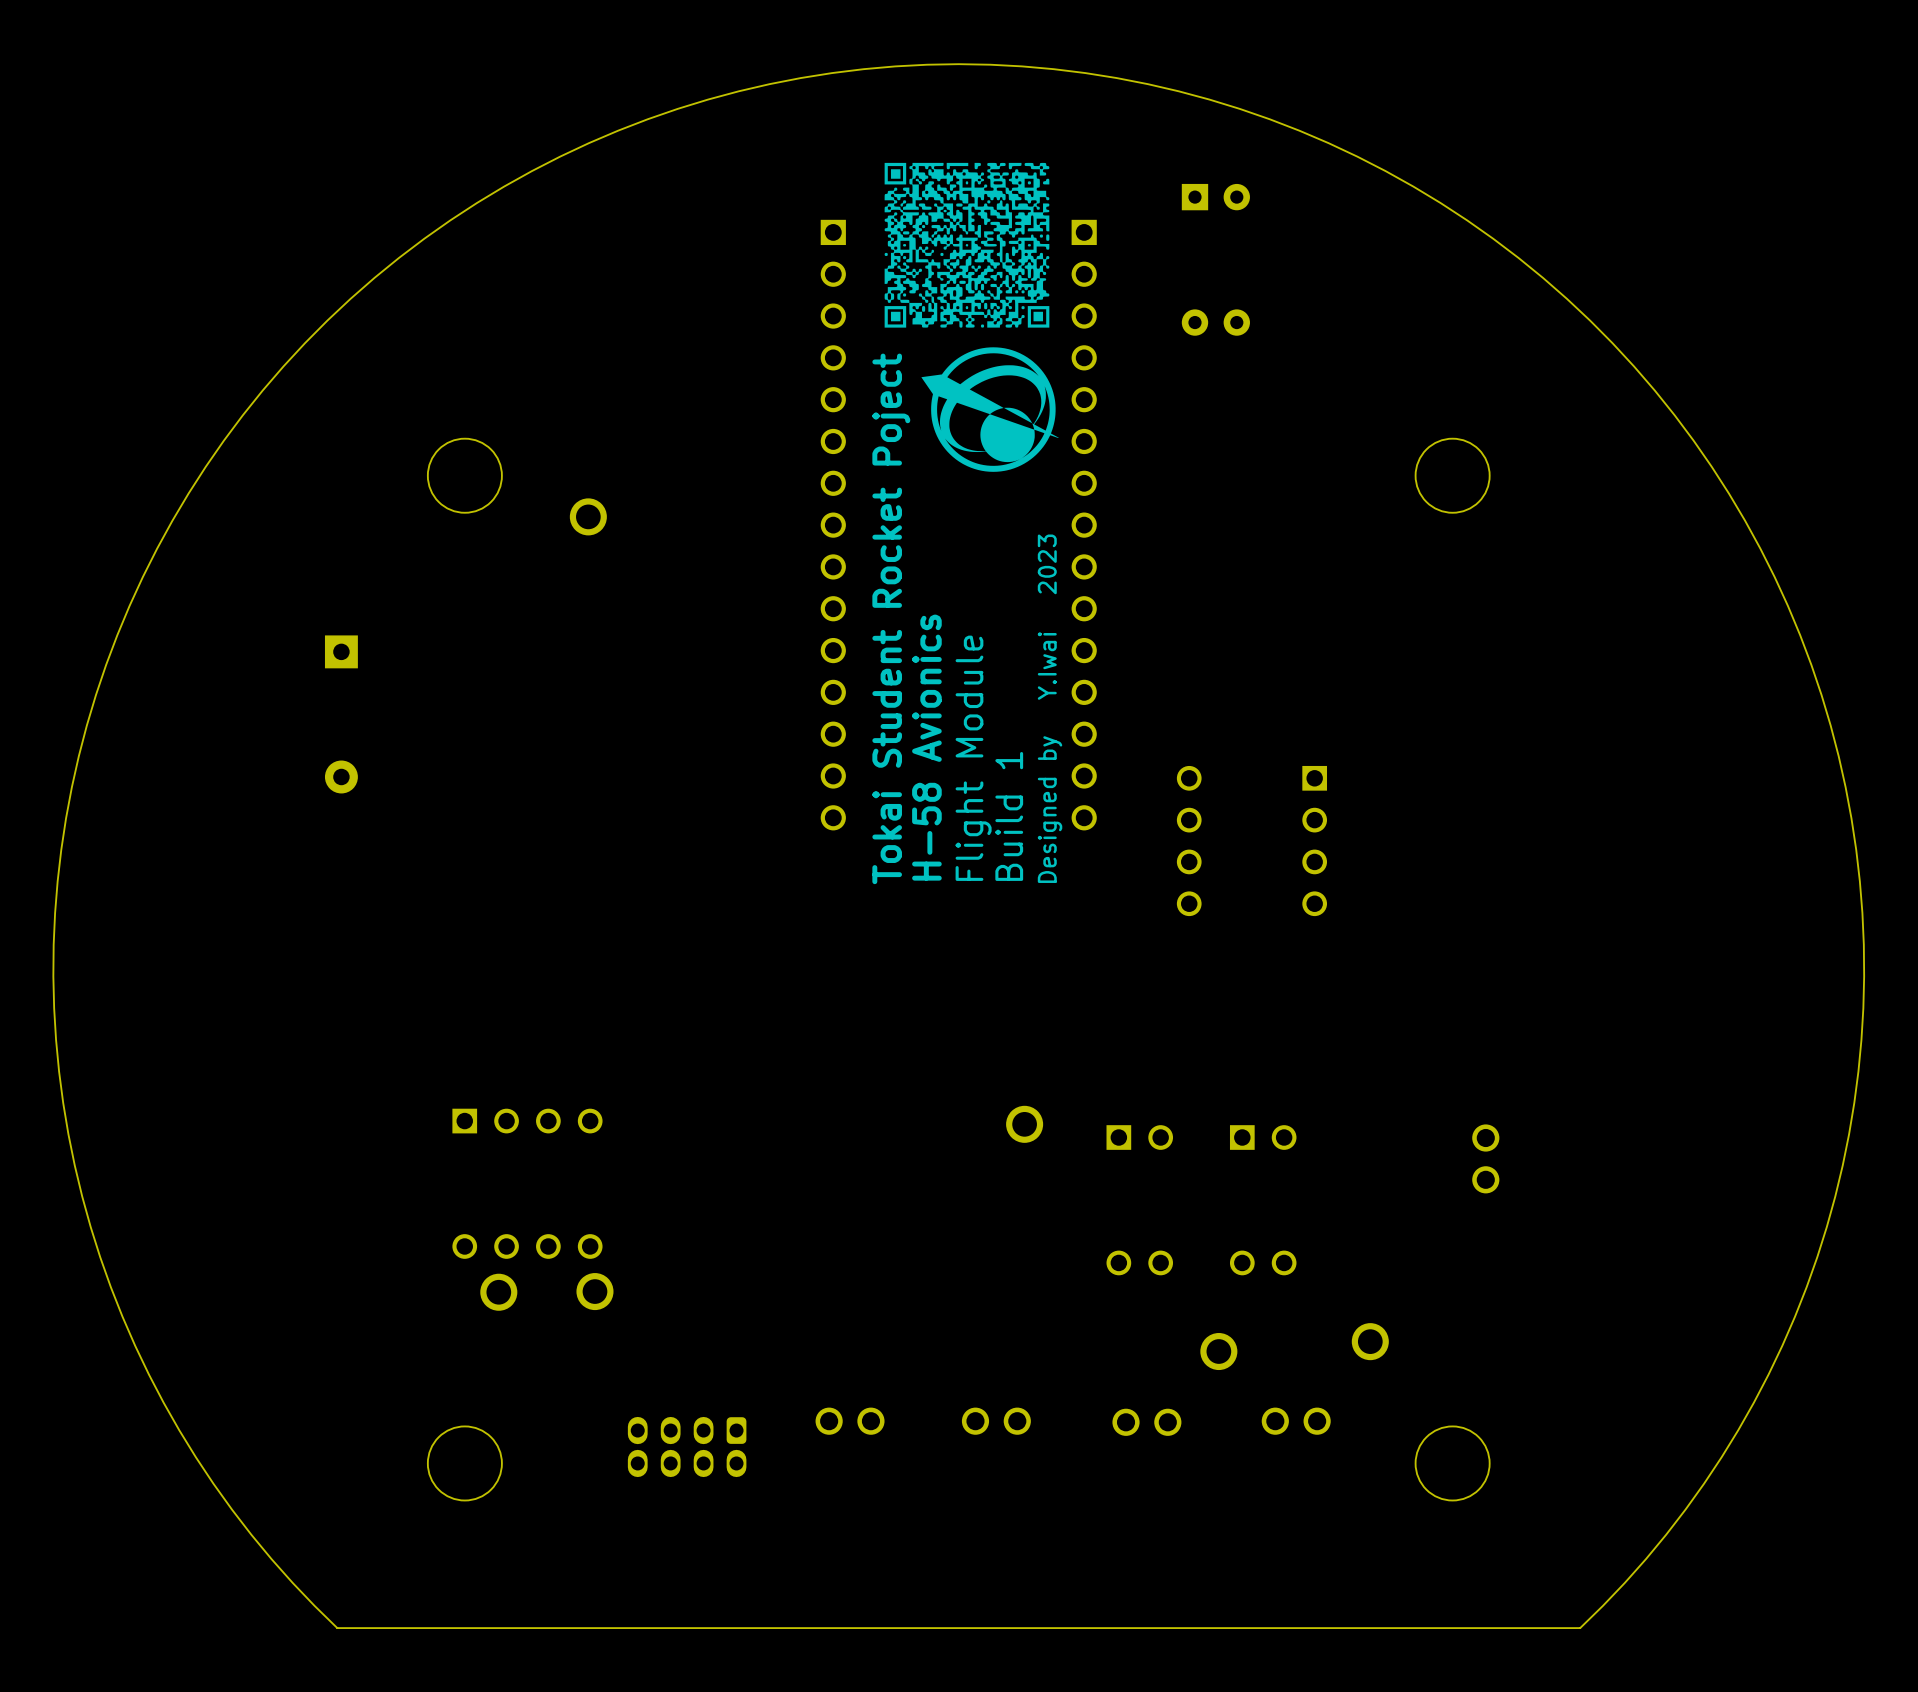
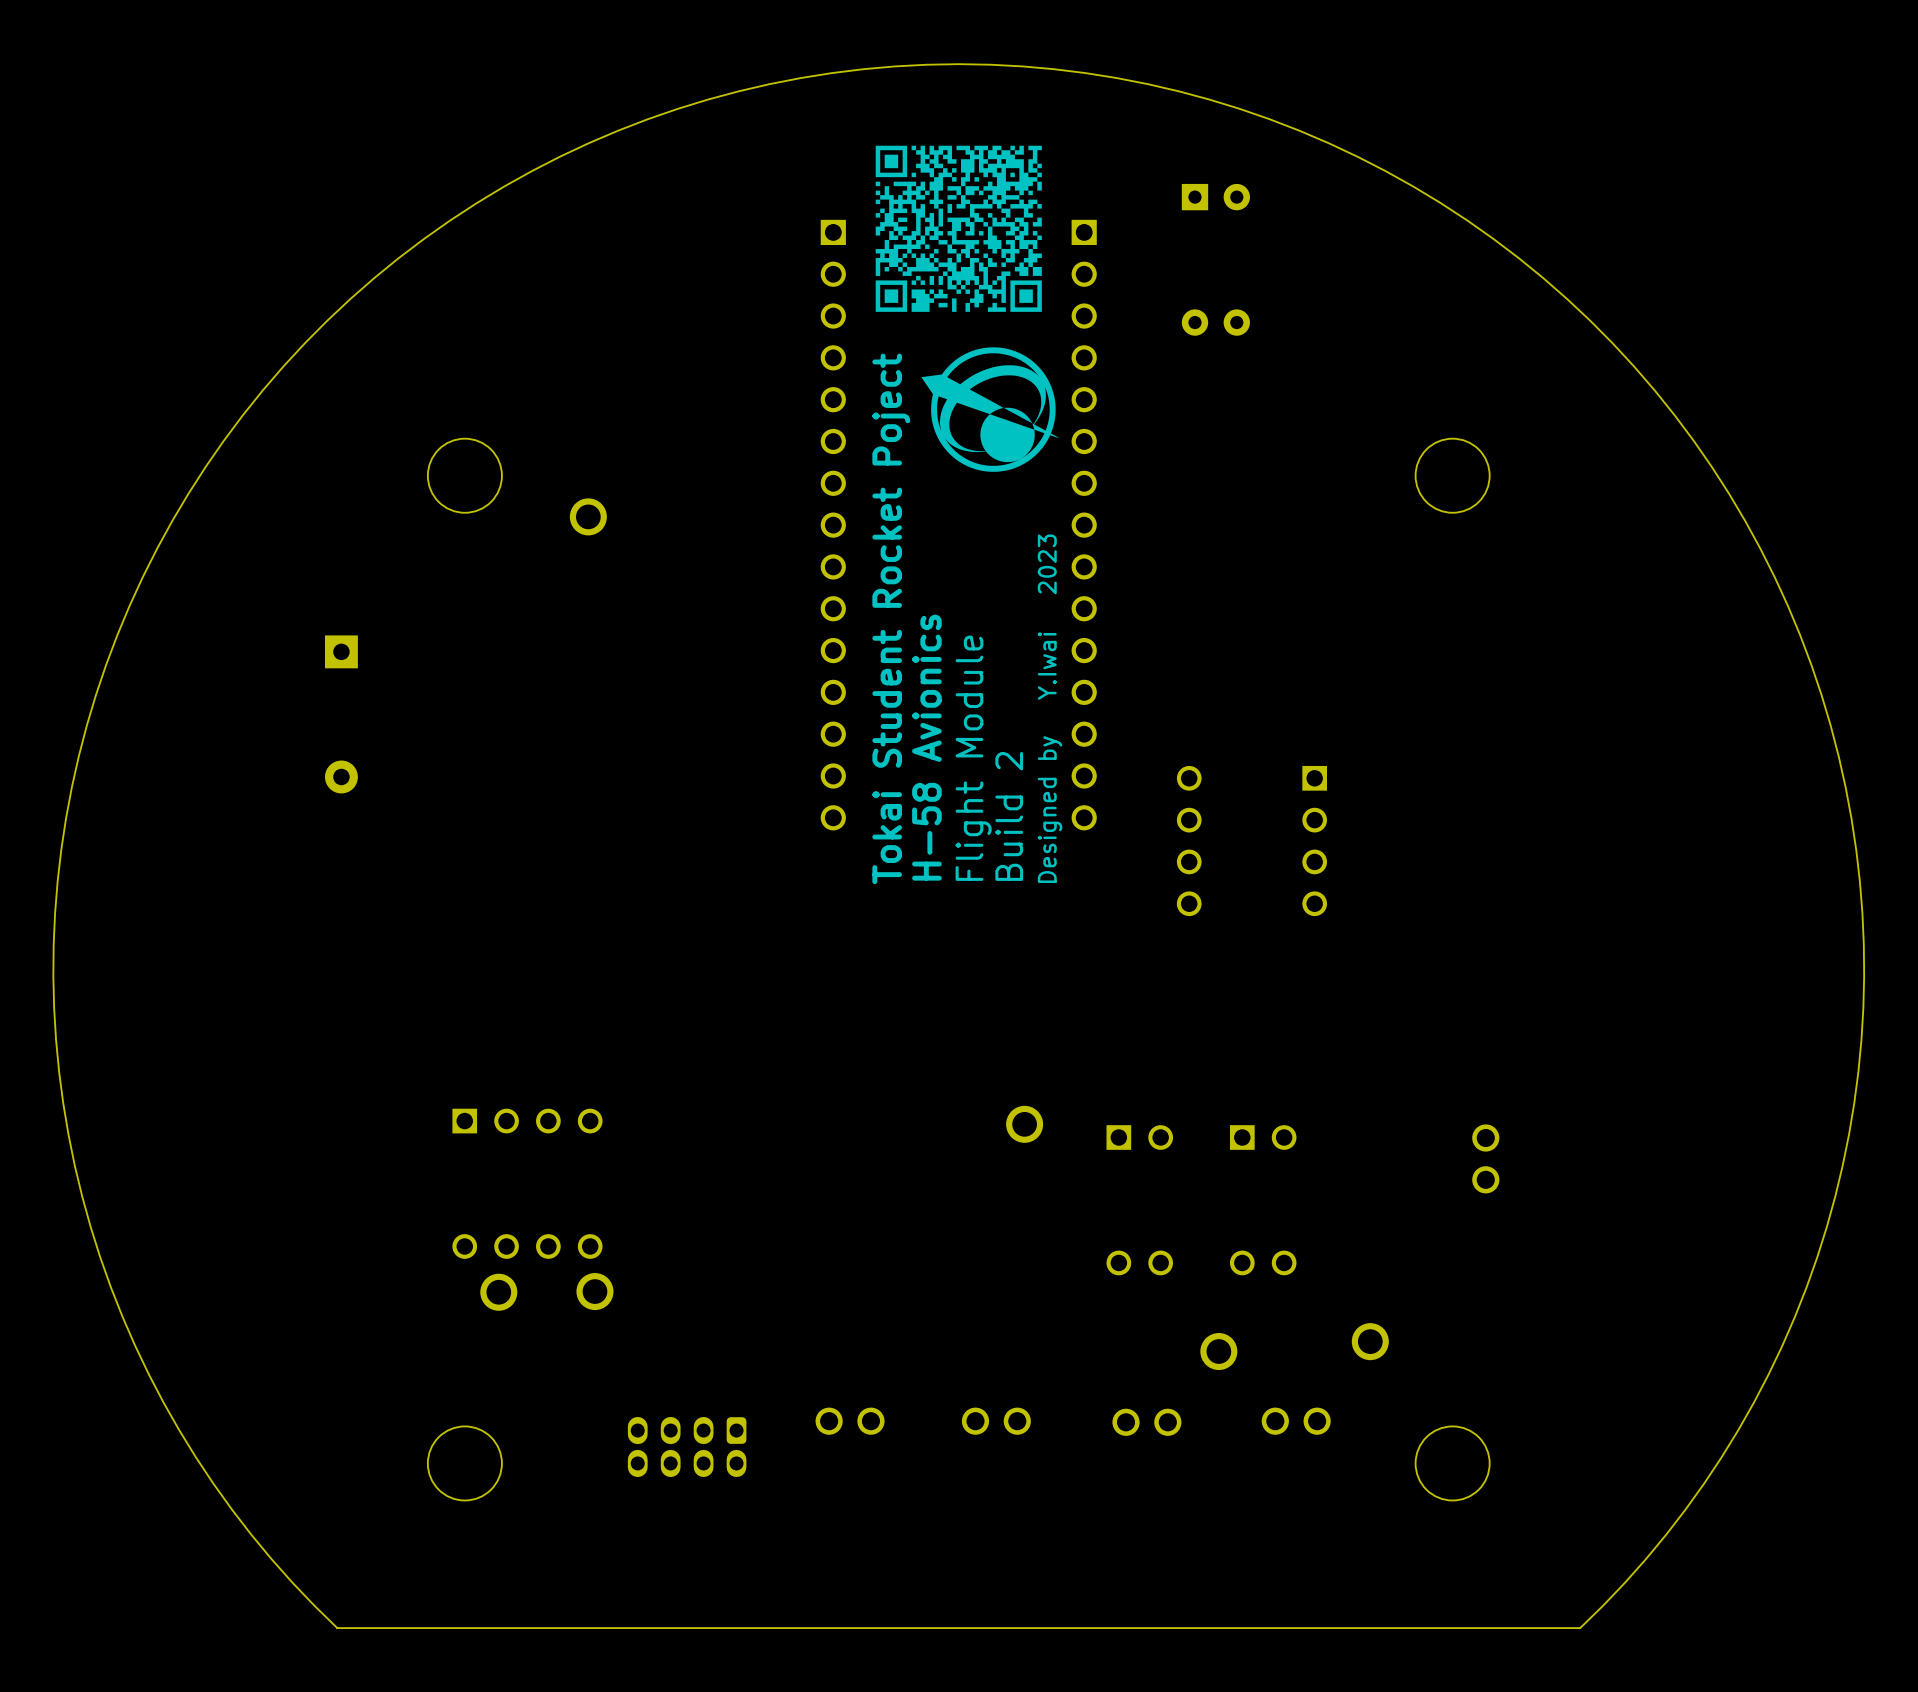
drawing: none -> [875, 145, 1042, 312]
drawing: [884, 162, 1050, 328] -> none
text: Build 1 (1009, 816) -> Build 2 (1009, 816)

